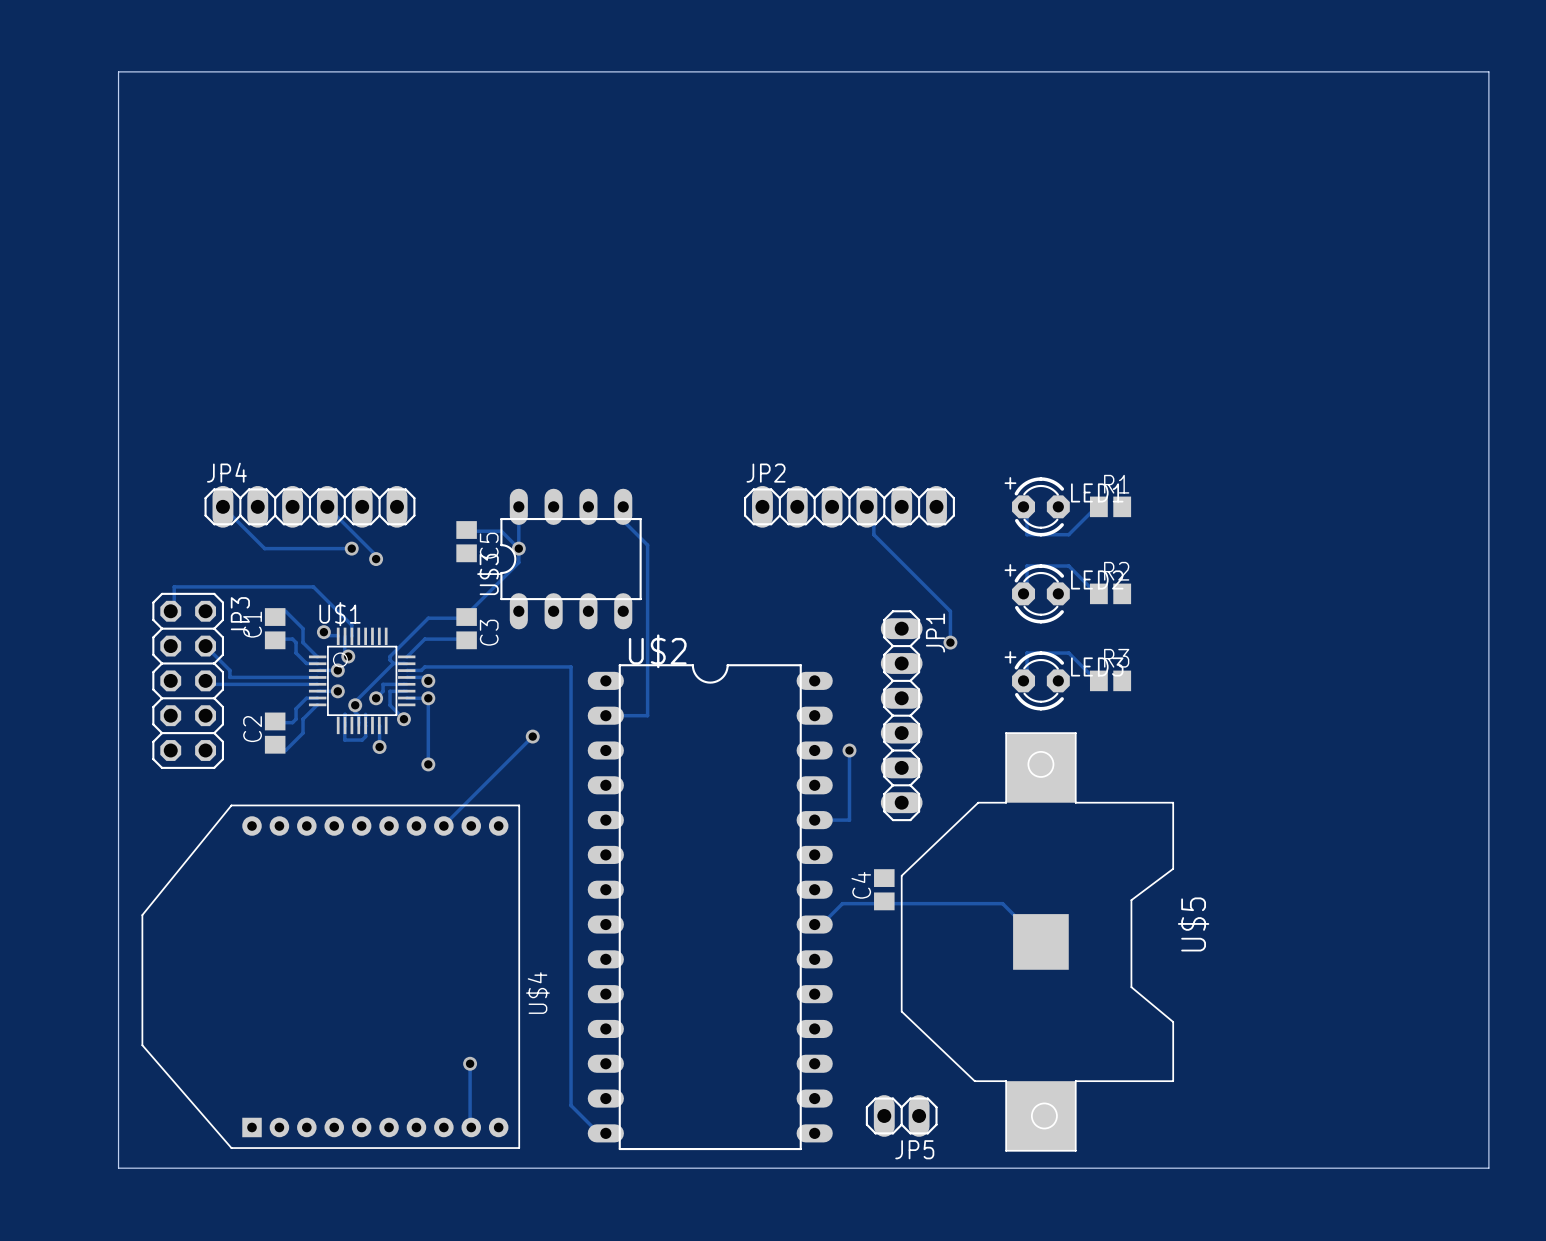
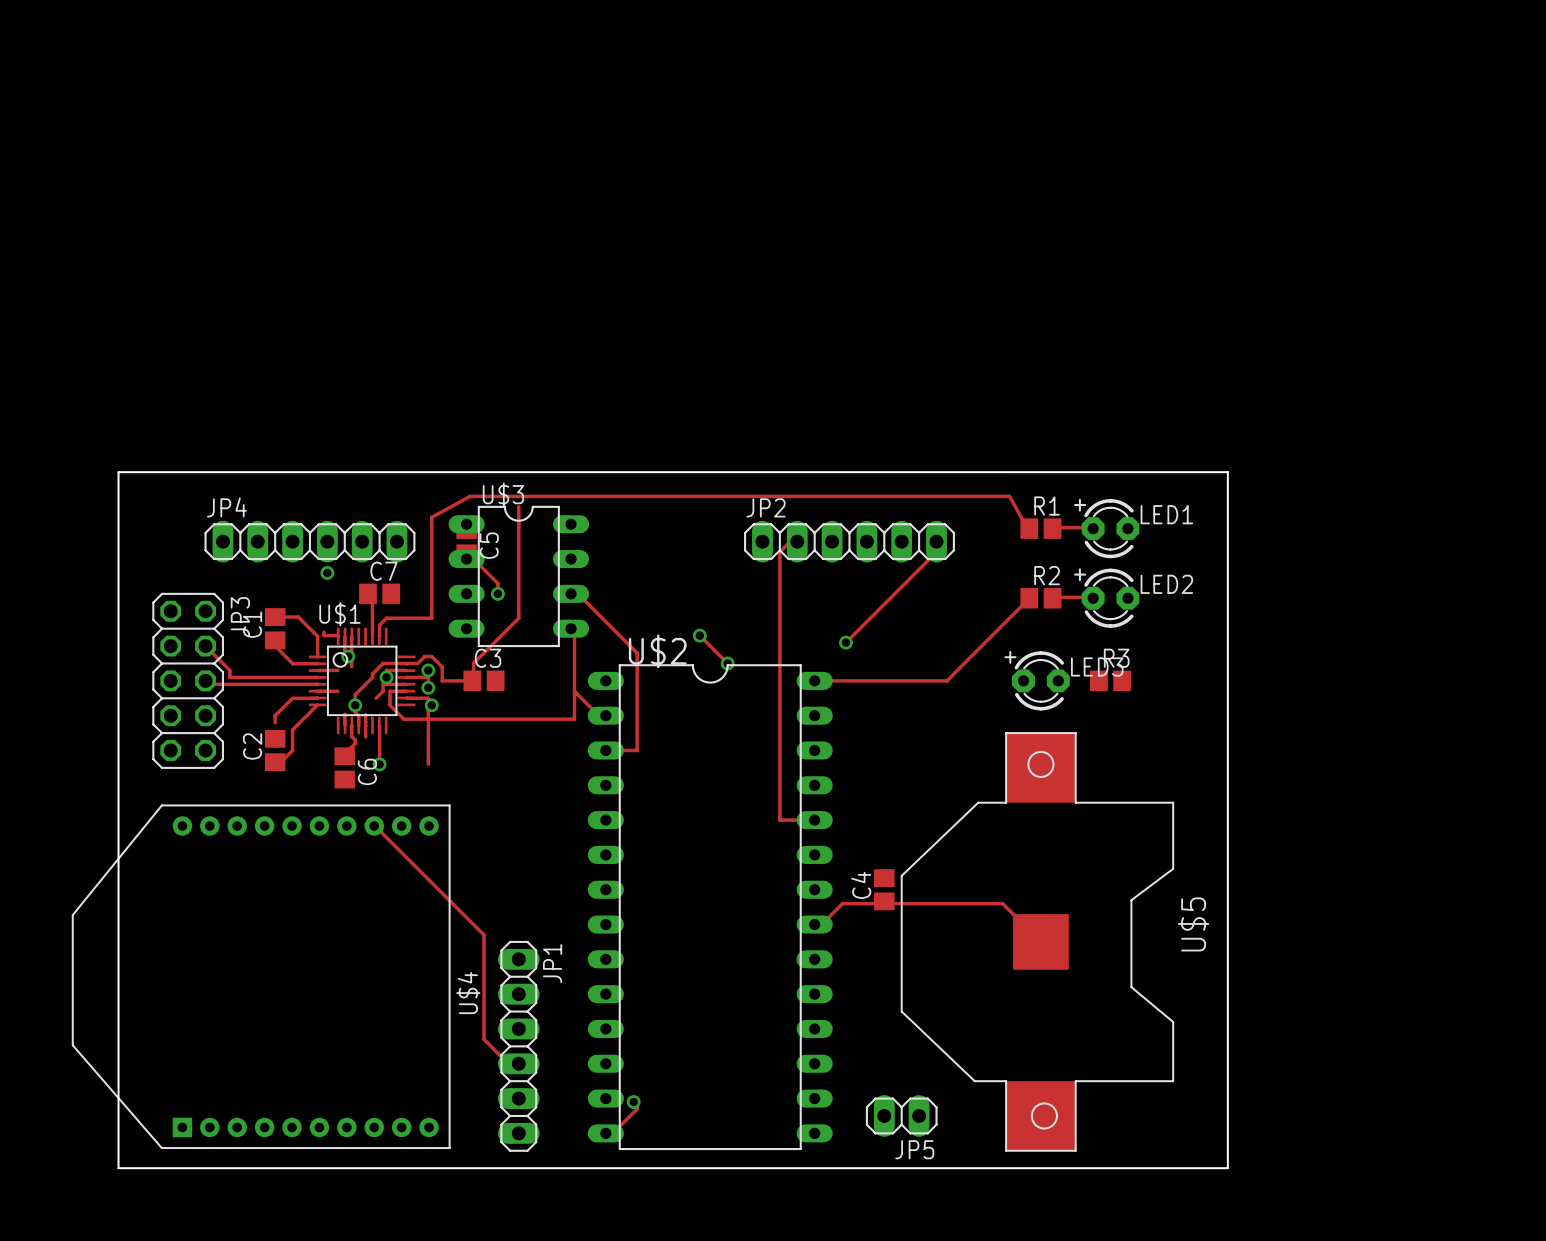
board edge: (118, 472) (118, 71) (1488, 71) (1488, 1168) (1227, 1168) -> (118, 472) (1227, 472) (1227, 1168)
track: (222, 506) (264, 548) (351, 548) -> none
JP4 position: (309, 506) -> (309, 541)
track: (327, 506) (376, 555) (376, 559) -> none
track: (623, 506) (623, 520) (647, 545) (647, 715) (605, 715) -> (574, 691) (598, 715) (605, 715)
JP2 position: (849, 506) -> (849, 541)
track: (866, 506) (873, 513) (873, 534) (950, 611) (950, 642) -> none
track: (1023, 506) (1027, 510) (1027, 534) (1068, 534) (1096, 506) (1098, 506) -> none
LED1 position: (1037, 506) -> (1106, 528)
R1 position: (1110, 506) -> (1040, 528)
track: none -> (1029, 528) (1009, 496) (470, 496) (431, 517) (431, 618)
track: none -> (1052, 528) (1093, 528)
track: (466, 530) (501, 531) (518, 548) -> none
track: none -> (936, 541) (936, 552) (846, 642)
via: (351, 548) -> none
via position: (518, 548) -> (497, 593)
via: (376, 559) -> none
track: none -> (466, 559) (473, 559) (497, 583) (497, 593)
U$3 rotation: 0° (571, 559) -> 90° clockwise (518, 576)
track: (518, 562) (466, 614) (466, 618) (431, 618) -> (518, 562) (518, 618) (473, 663) (473, 680) (442, 680) (442, 666) (431, 656) (424, 656) (417, 663) (406, 663)
via: none -> (327, 572)
track: none -> (367, 593) (372, 598) (372, 636)
C7: none -> (379, 593)
track: none -> (571, 593) (577, 593) (637, 653) (637, 750) (605, 750)
track: (1023, 593) (1027, 590) (1027, 566) (1068, 566) (1096, 593) (1098, 593) -> none
LED2 position: (1037, 593) -> (1106, 598)
R2 position: (1110, 593) -> (1040, 598)
track: none -> (1029, 598) (946, 680) (814, 680)
track: none -> (1052, 598) (1093, 598)
track: (170, 611) (174, 607) (174, 586) (313, 586) (351, 625) (351, 636) -> (351, 666) (351, 636)
track: (275, 617) (275, 611) (285, 611) (303, 628) (303, 642) (317, 656) -> (275, 617) (298, 617) (317, 636) (317, 656)
track: (428, 618) (390, 656) (390, 660) (393, 663) (355, 701) -> (393, 663) (383, 663) (355, 694) (355, 701)
track: none -> (428, 618) (386, 618) (379, 625) (379, 636)
C3 rotation: 0° (466, 628) -> 90° clockwise (484, 680)
C3 position: (466, 628) -> (484, 680)
track: none -> (571, 628) (574, 632) (574, 719) (403, 719)
via: (323, 632) -> none
C3 name position: C3 (489, 632) -> C3 (488, 658)
track: none -> (699, 635) (727, 663)
via: none -> (699, 635)
track: (275, 640) (292, 639) (296, 642) (296, 653) (306, 663) (317, 663) -> (275, 640) (275, 646) (292, 663) (317, 663)
track: (466, 640) (424, 639) (406, 656) -> none
via: none -> (846, 642)
via: (950, 642) -> none
via: none -> (727, 663)
via: (337, 670) -> none
track: (406, 670) (421, 670) (424, 666) (571, 666) (571, 1105) (598, 1133) (605, 1133) -> (633, 1102) (637, 1105) (637, 1109) (612, 1133) (605, 1133)
track: none -> (406, 670) (386, 670) (386, 677)
via: none -> (428, 670)
via: none -> (386, 677)
via: (428, 680) -> none
track: (1023, 680) (1027, 677) (1027, 653) (1068, 653) (1096, 680) (1098, 680) -> none
via: none -> (428, 687)
via: (337, 691) -> none
track: (306, 698) (296, 708) (296, 719) (292, 722) (275, 722) -> (306, 698) (292, 698) (275, 715) (275, 721)
via: (376, 698) -> none
via: (428, 698) -> none
track: (317, 704) (303, 719) (303, 733) (285, 750) (275, 750) (275, 744) -> (317, 704) (292, 729) (292, 750) (280, 762) (275, 762)
via: none -> (431, 705)
JP1 position: (901, 715) -> (518, 1046)
via: (403, 719) -> none
track: (345, 725) (344, 740) (362, 740) (365, 736) -> none
track: none -> (351, 725) (351, 736) (355, 740) (355, 743) (344, 756)
C2 position: (275, 733) -> (275, 750)
track: (532, 736) (443, 826) -> none
via: (532, 736) -> none
track: none -> (379, 747) (379, 764)
via position: (379, 747) -> (379, 764)
track: (849, 750) (849, 820) (814, 820) -> (797, 541) (797, 534) (779, 552) (779, 820) (814, 820)
via: (849, 750) -> none
via: (428, 764) -> none
C6: none -> (344, 767)
track: none -> (374, 826) (484, 934) (484, 1039) (508, 1063) (518, 1063)
U$4 position: (330, 976) -> (261, 976)
track: (470, 1063) (471, 1127) -> none
via: (470, 1063) -> none
via: none -> (633, 1102)

